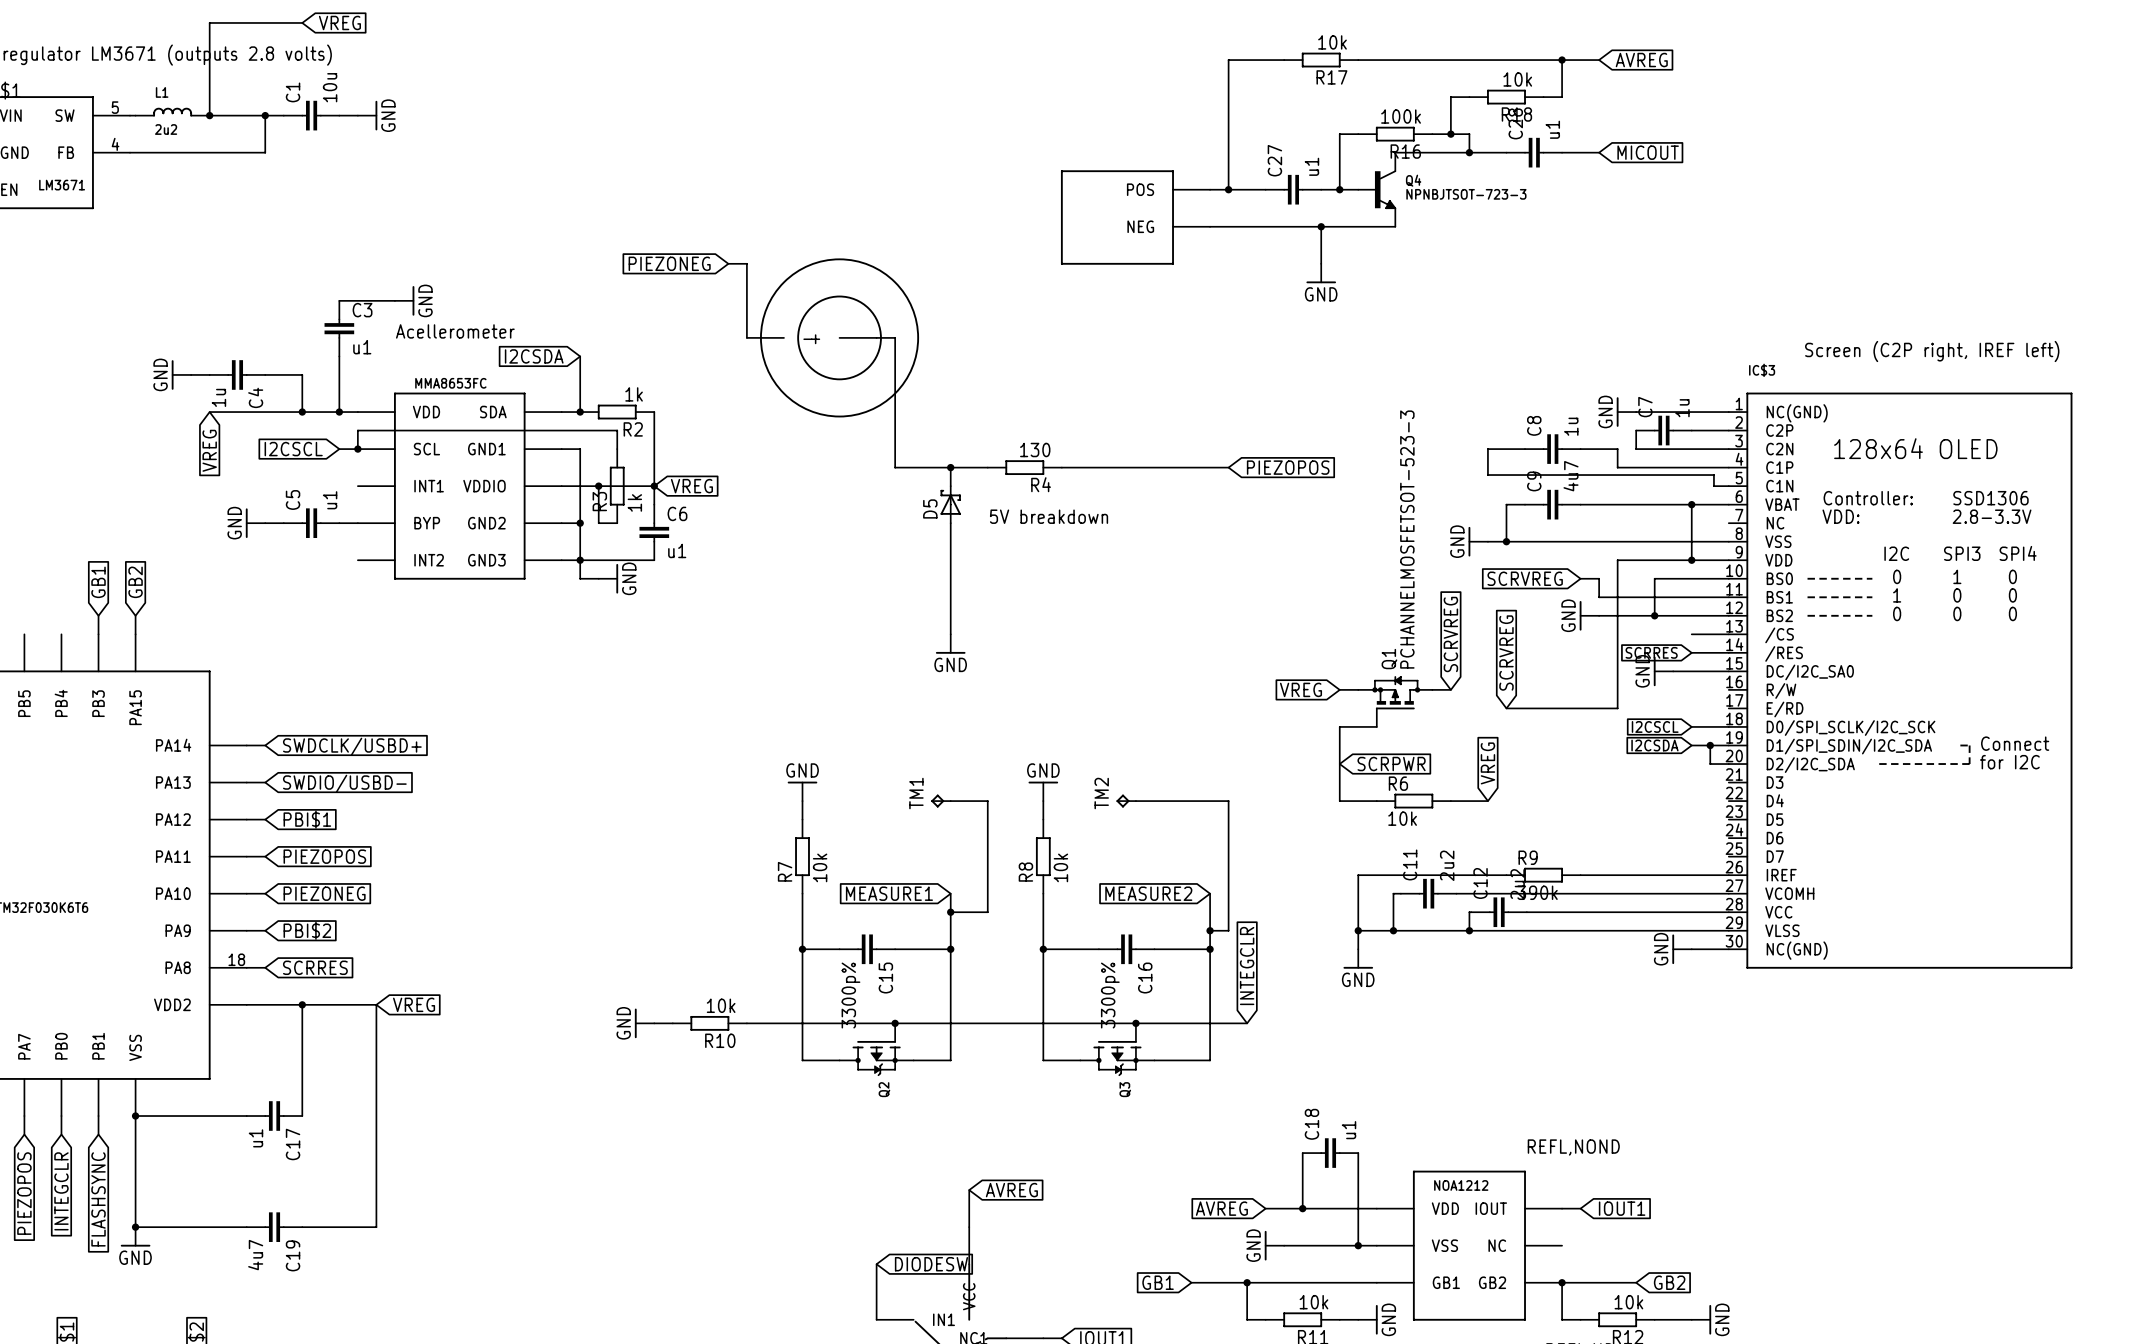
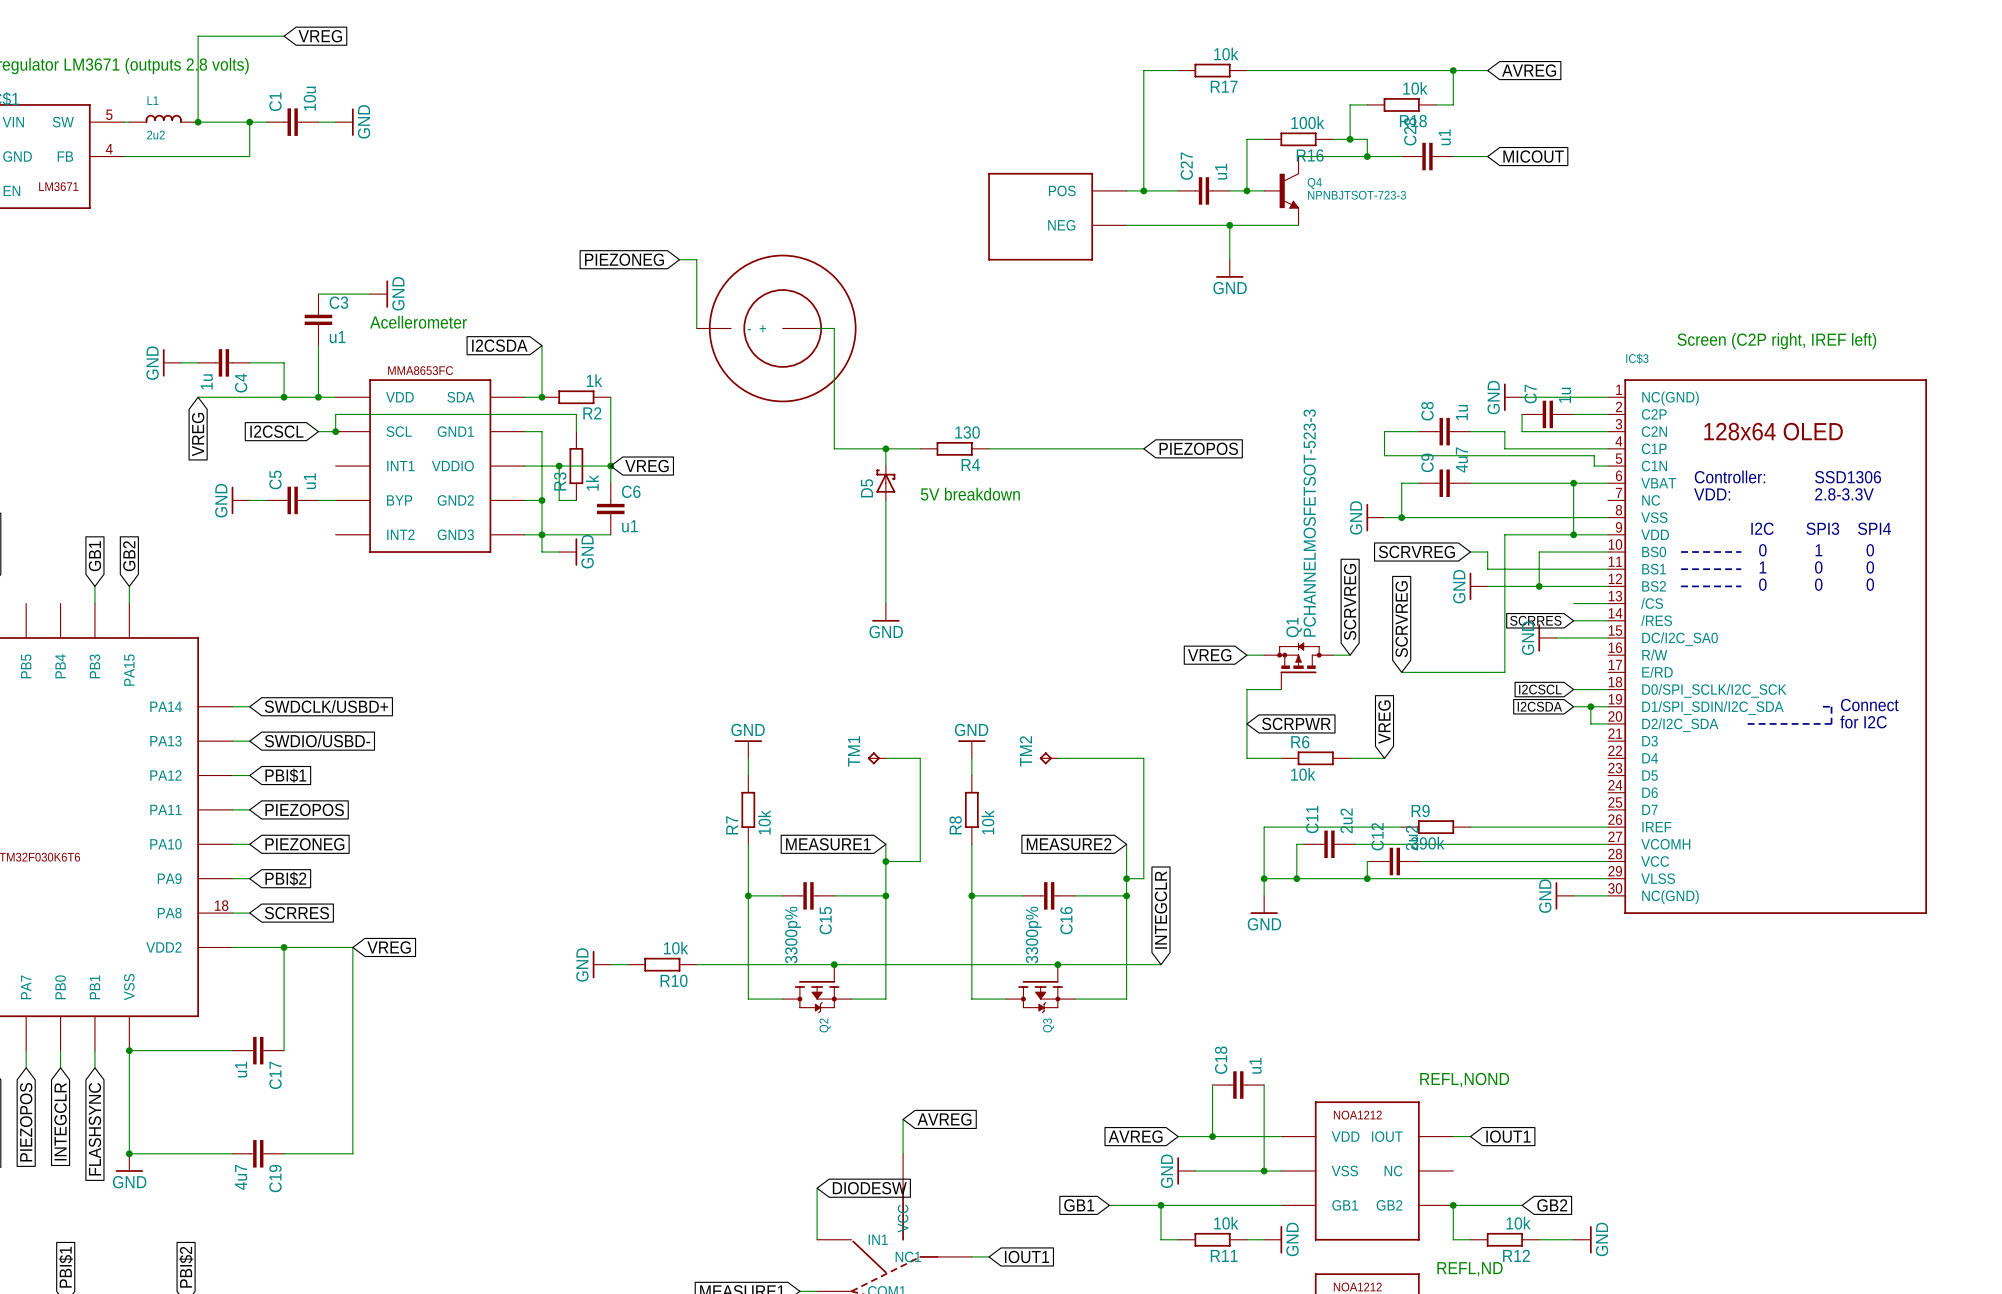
R17 position: (1321, 60) -> (1212, 70)

